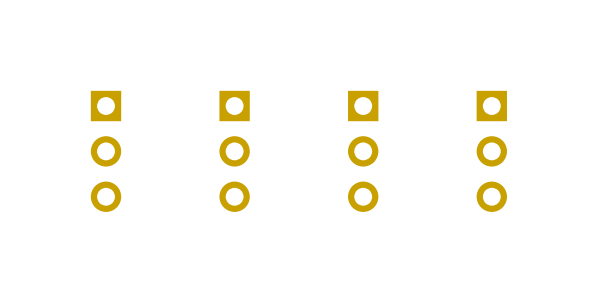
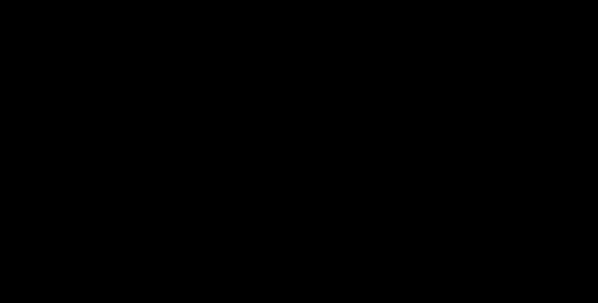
part: (106, 151) -> none
part: (234, 151) -> none
part: (363, 151) -> none
part: (491, 151) -> none

